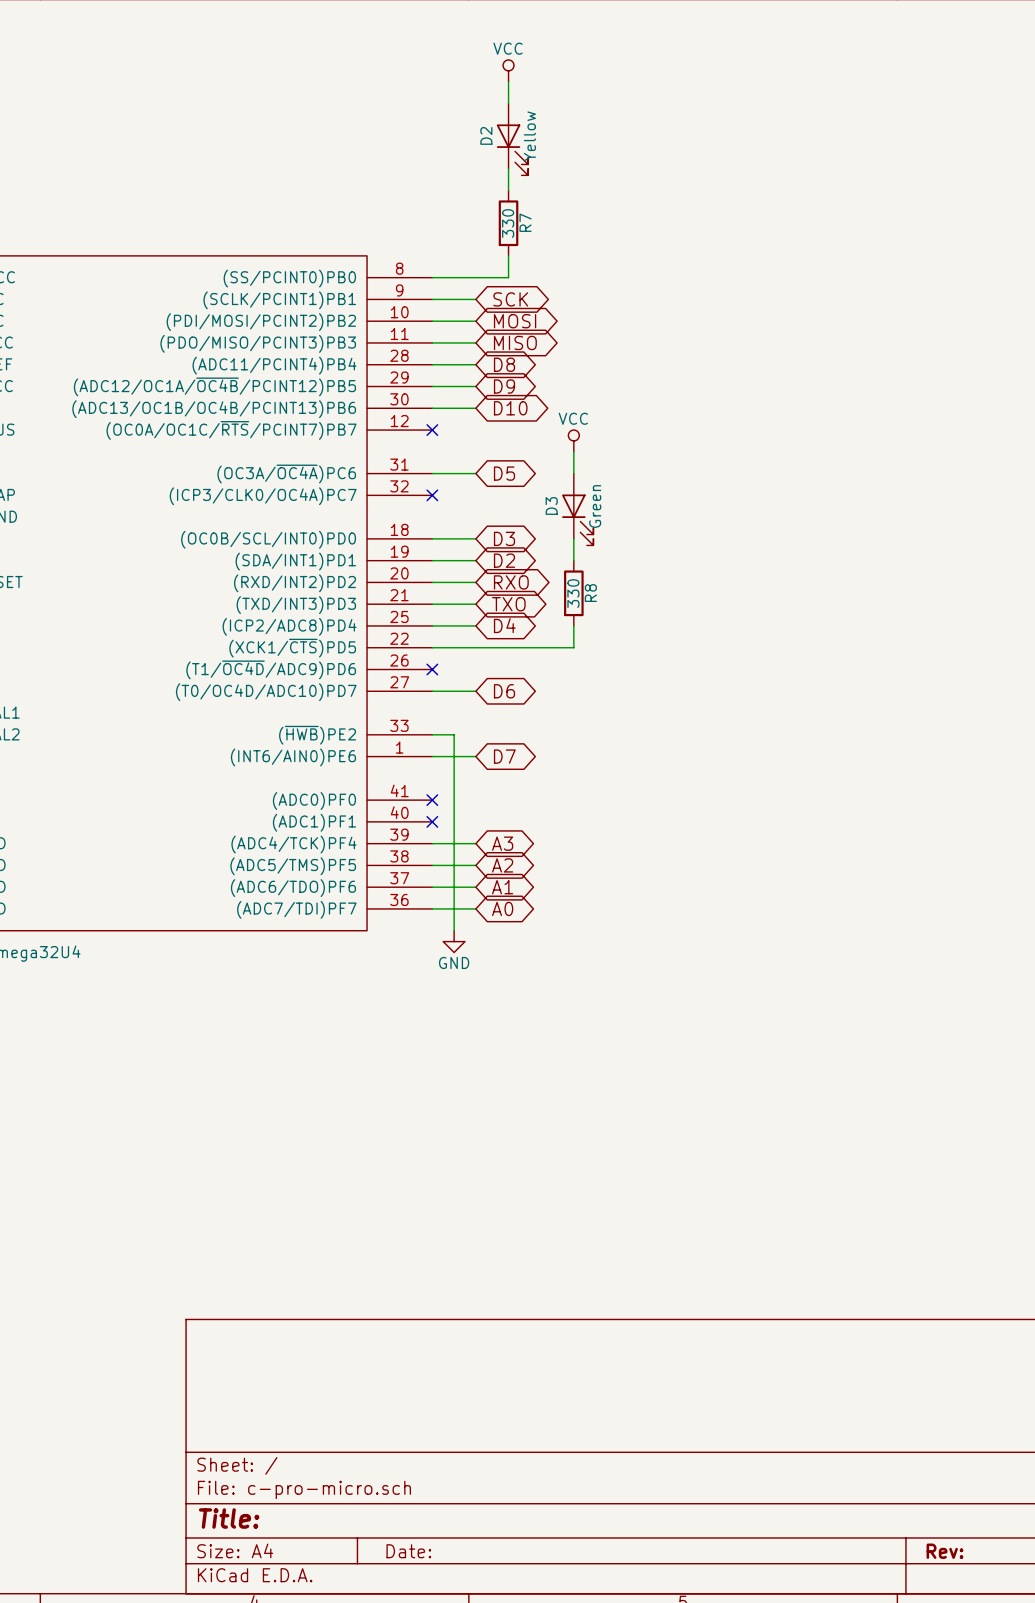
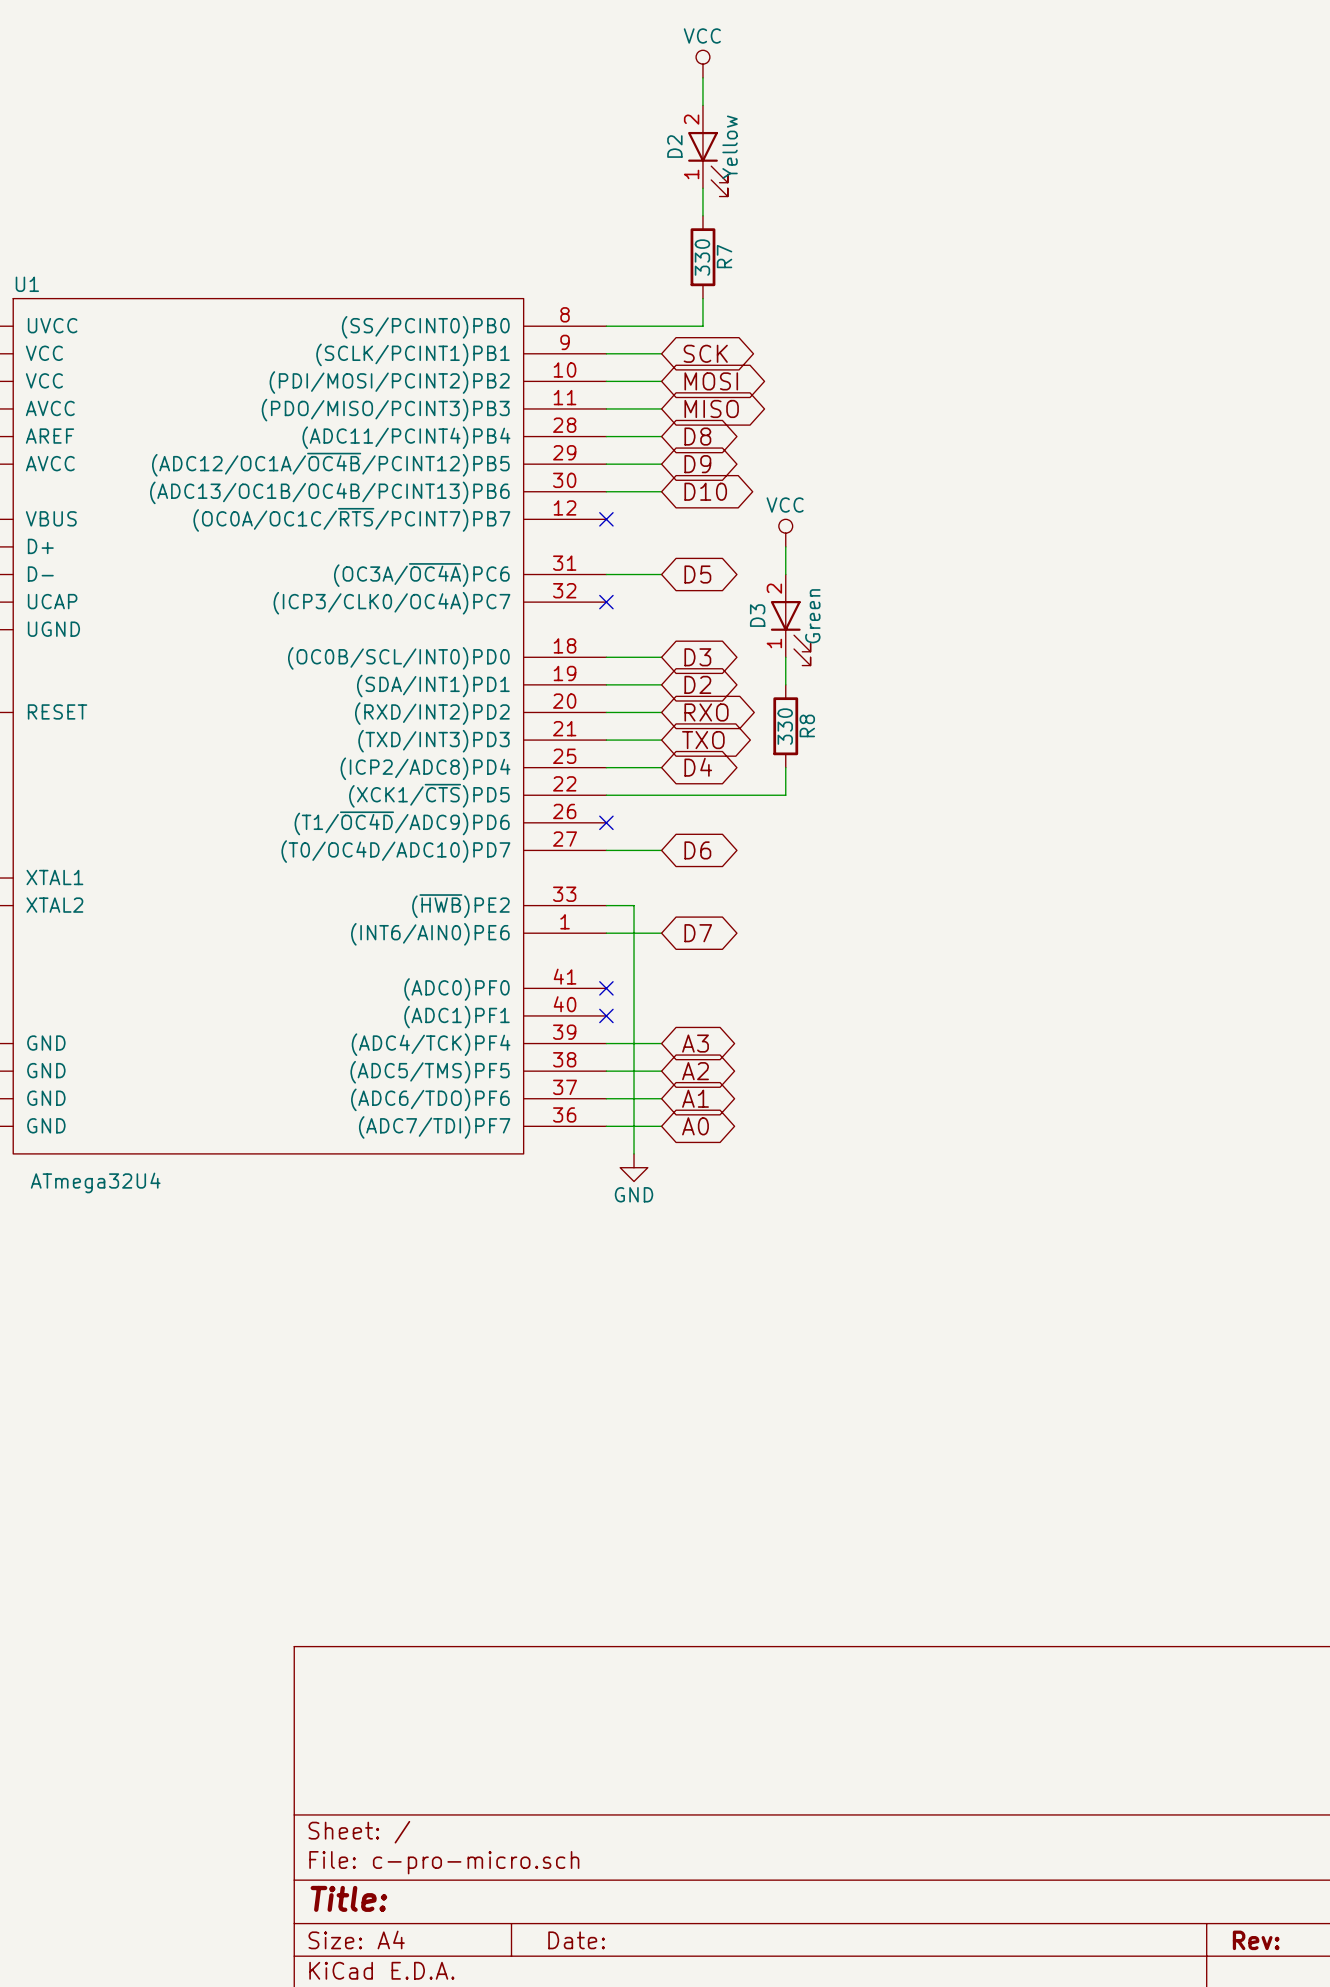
D2 pin number: none -> 2 (691, 119)
D2 pin number: none -> 1 (691, 174)
D3 pin number: none -> 2 (774, 588)
D3 pin number: none -> 1 (774, 643)

